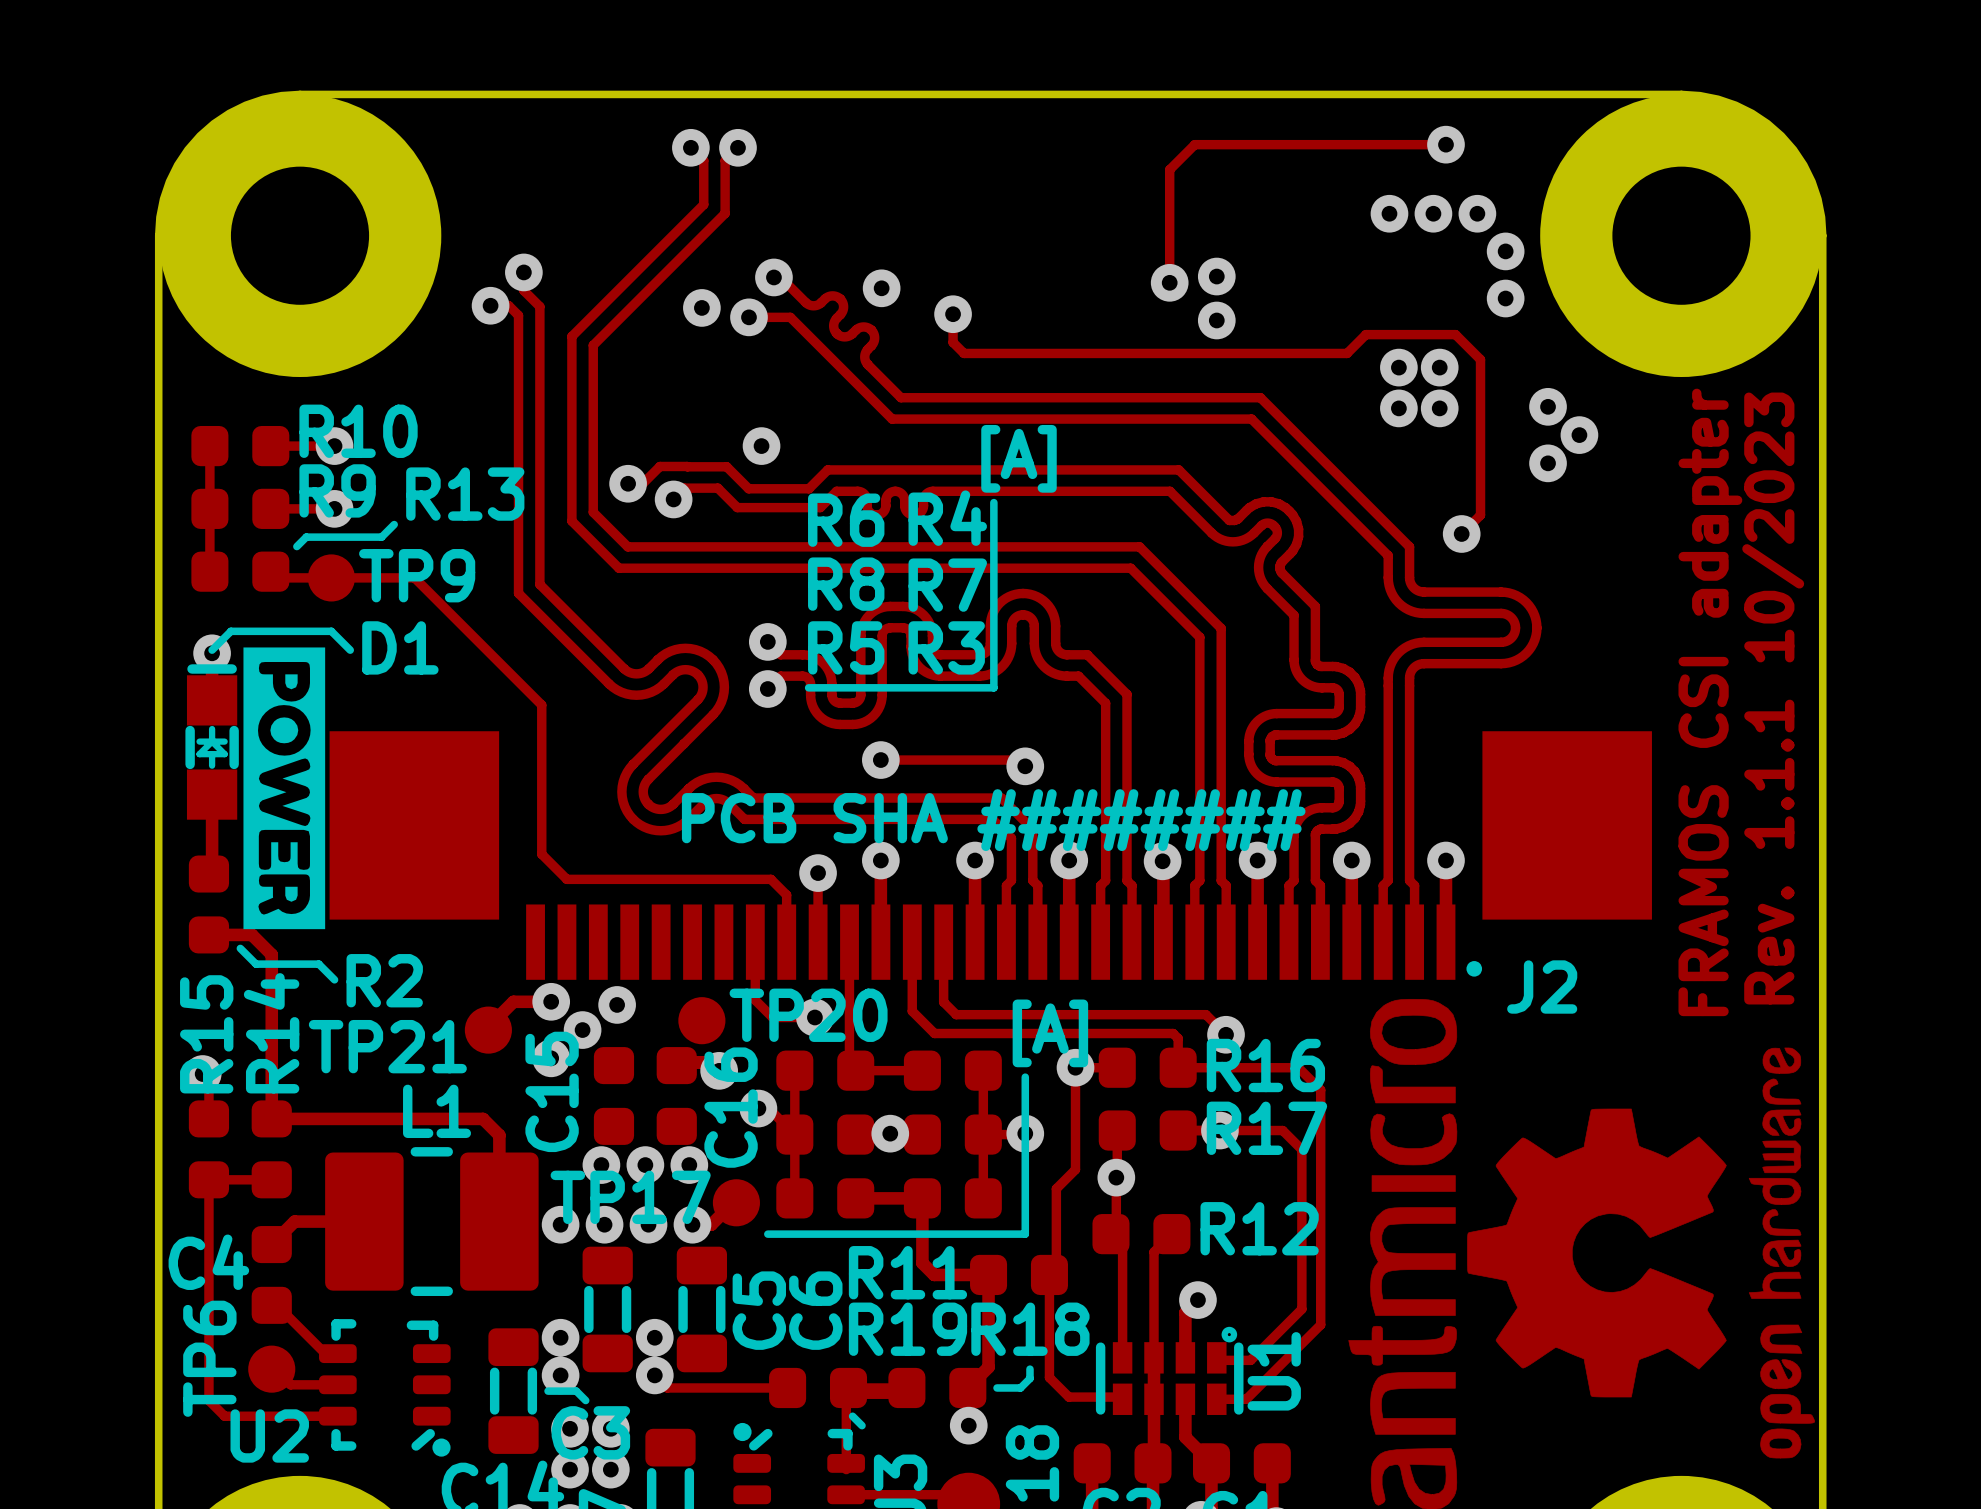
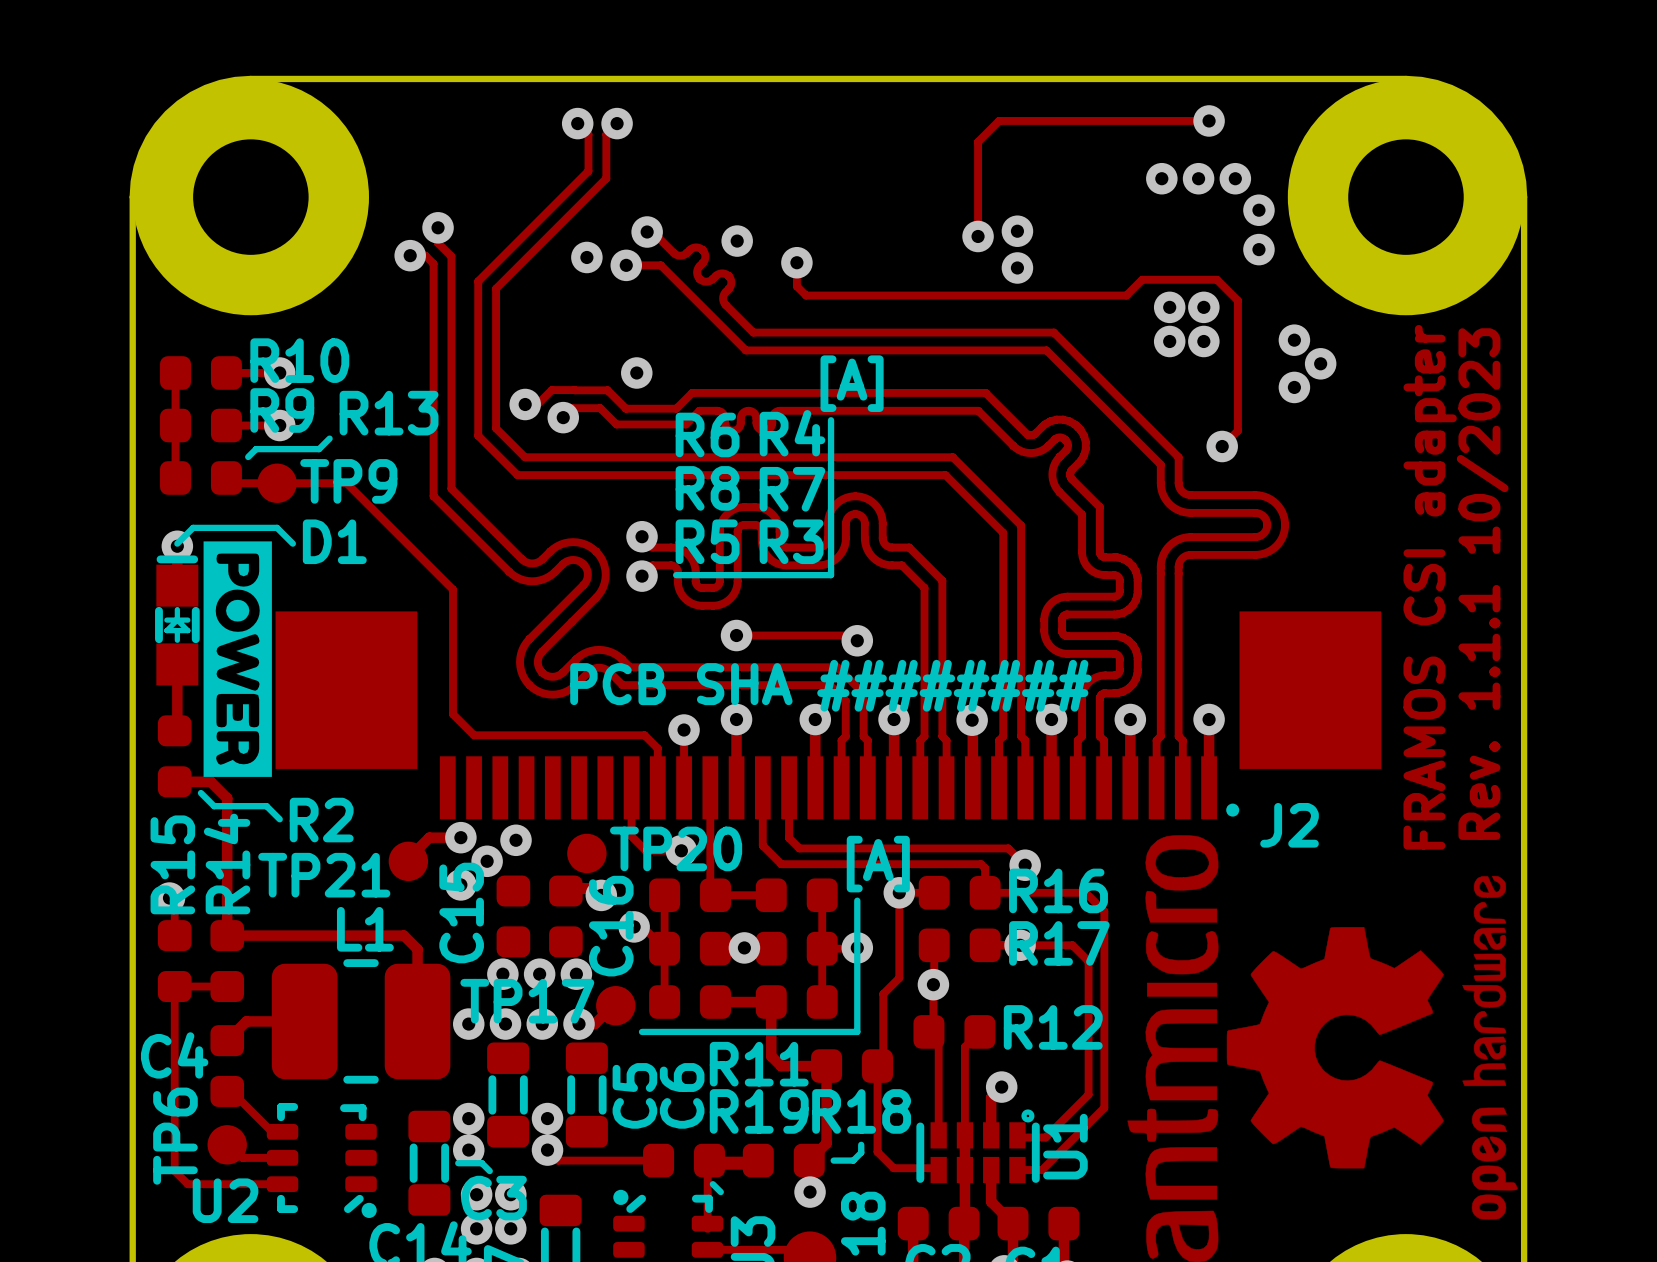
L1 footprint: [325, 1147, 539, 1296] -> [271, 959, 451, 1084]

